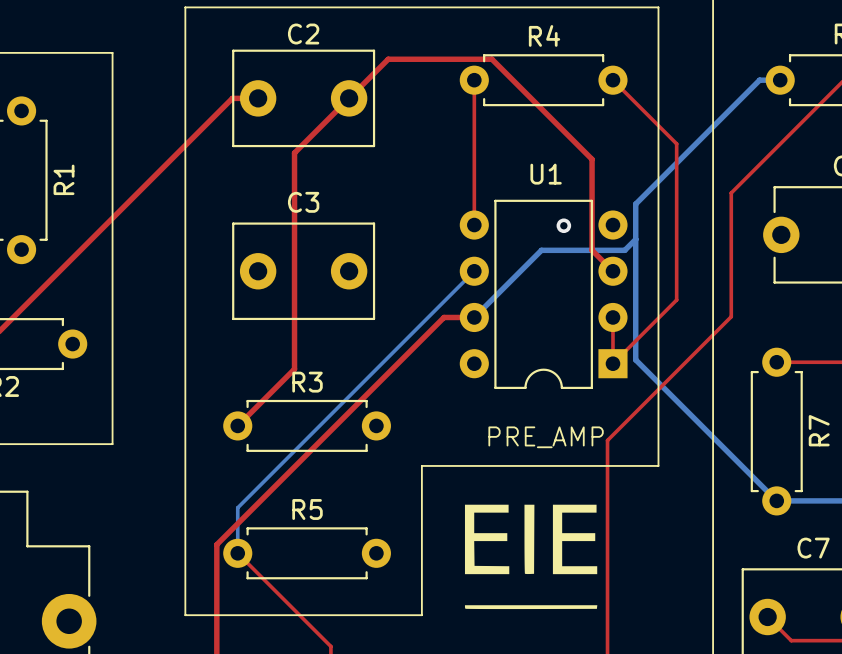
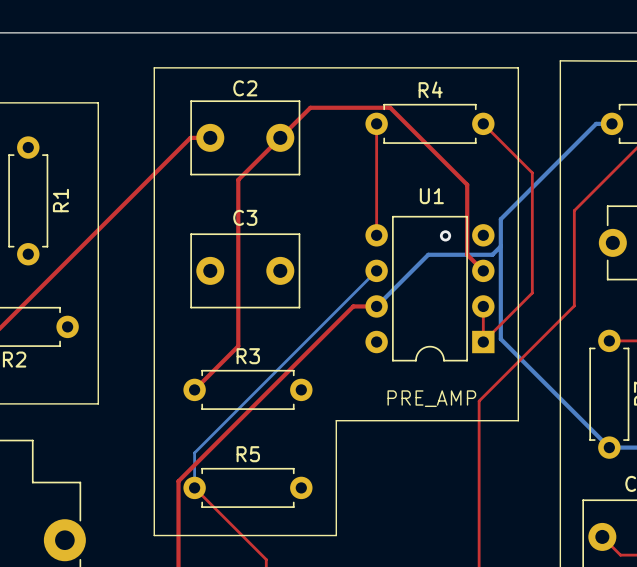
drawing: [464, 504, 598, 610] -> none

